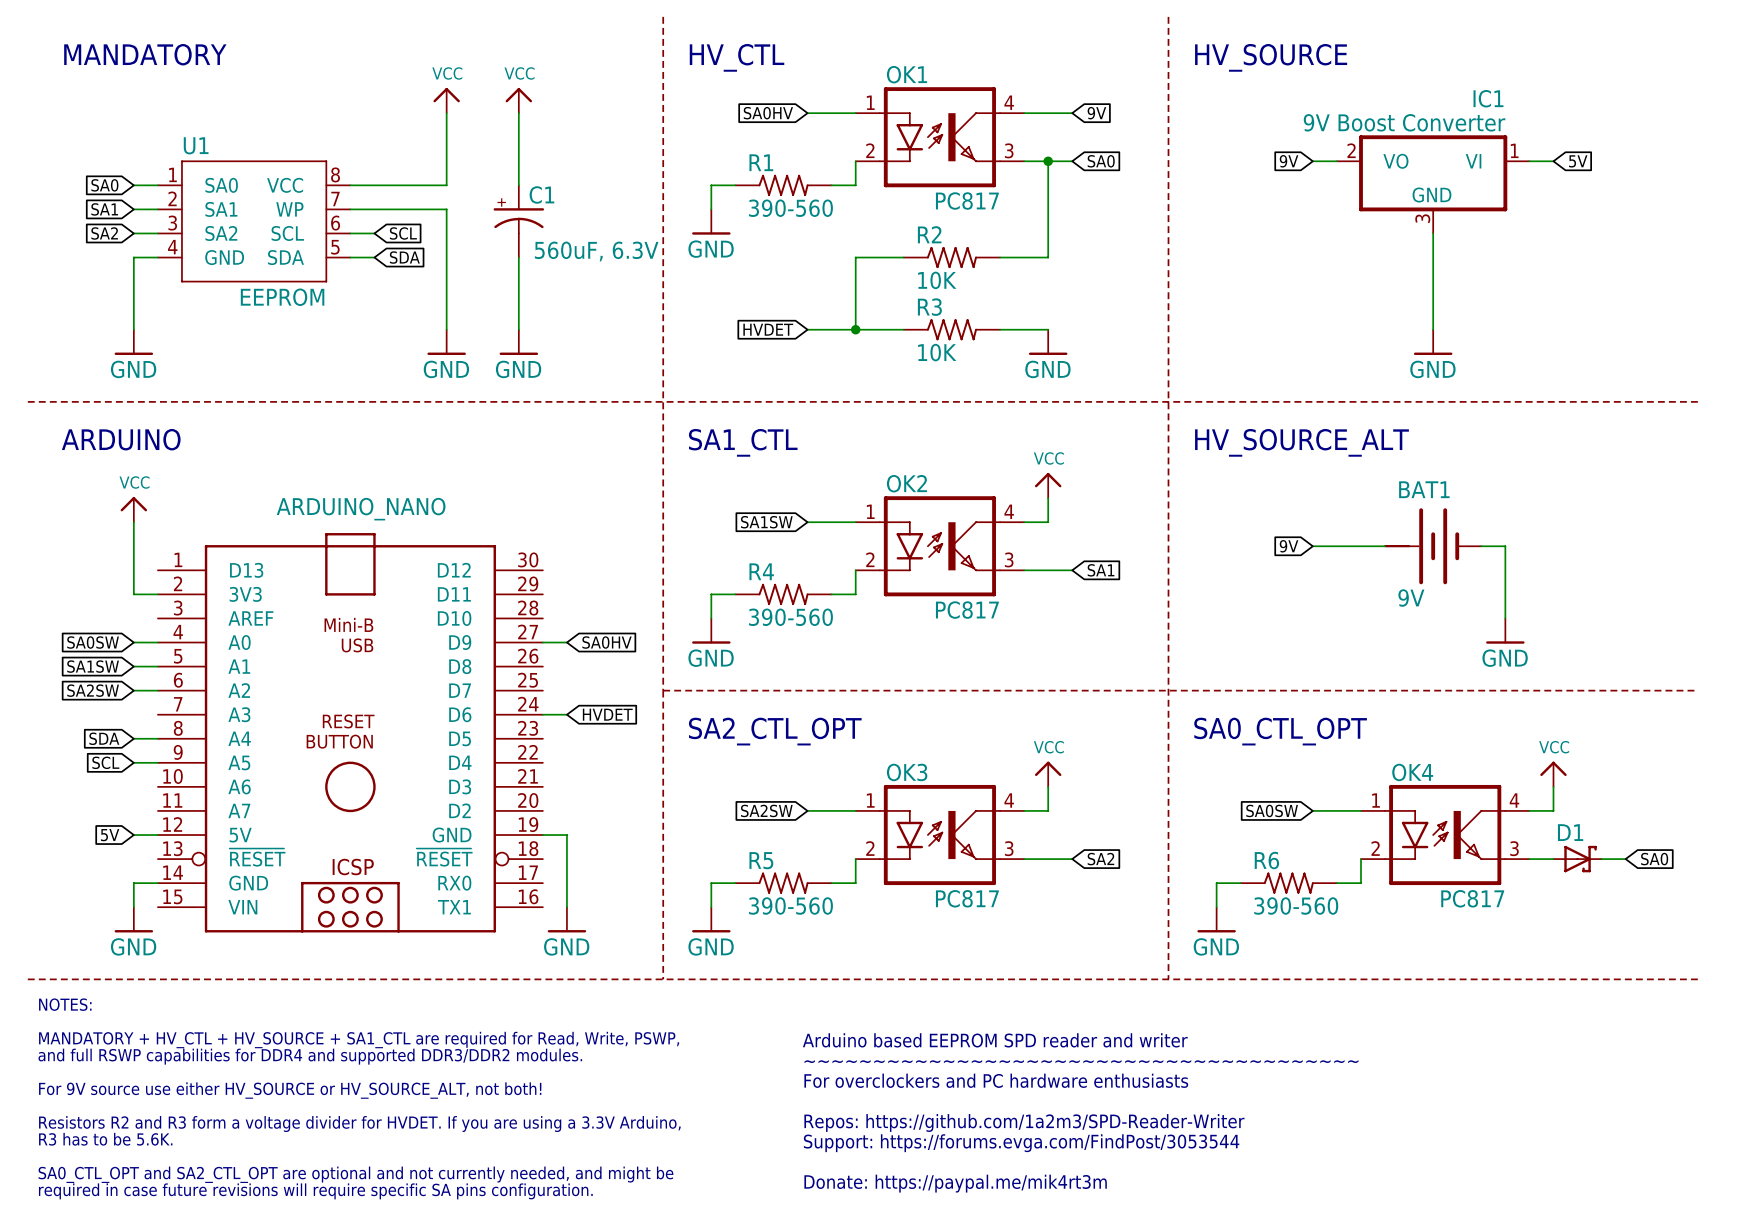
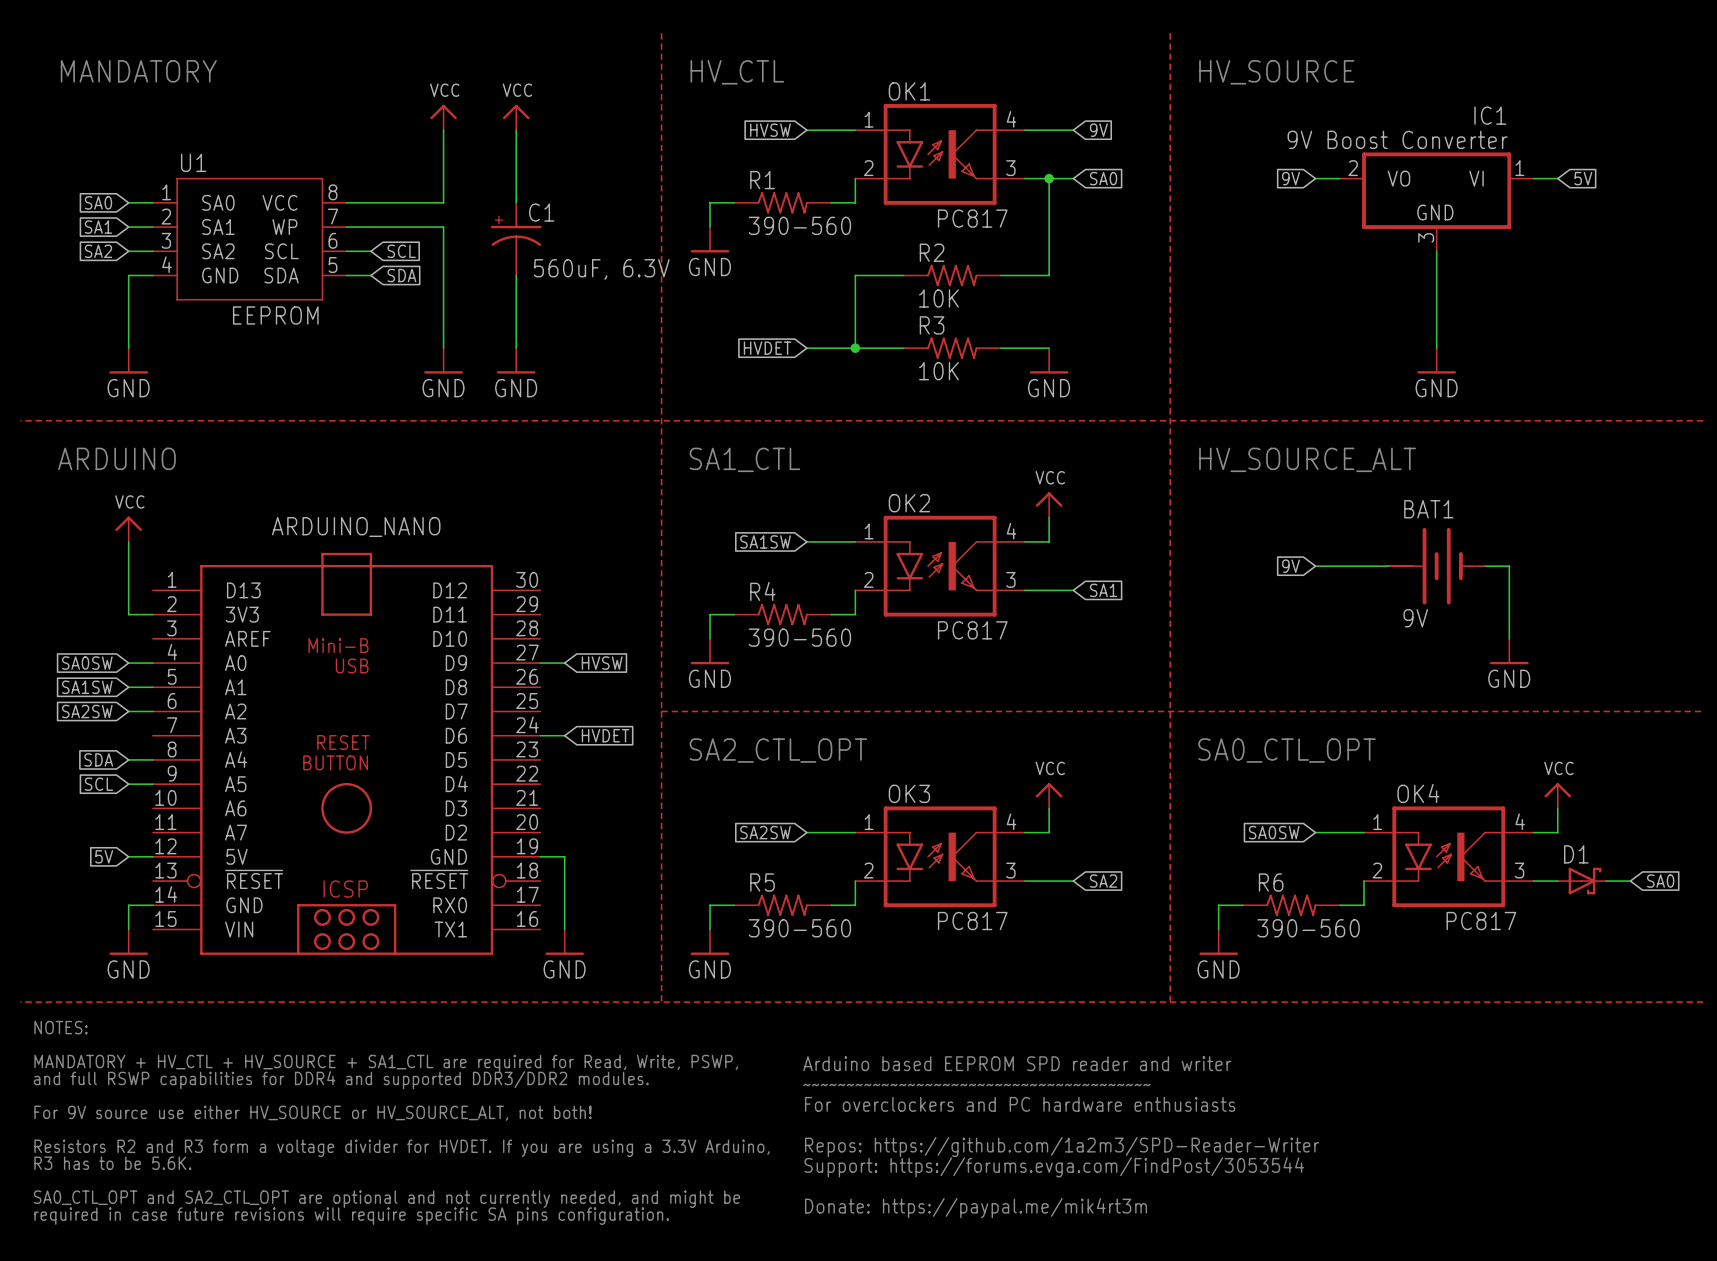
global label: SA0HV (768, 113) -> HVSW (770, 130)
global label: SA0HV (607, 642) -> HVSW (602, 663)

